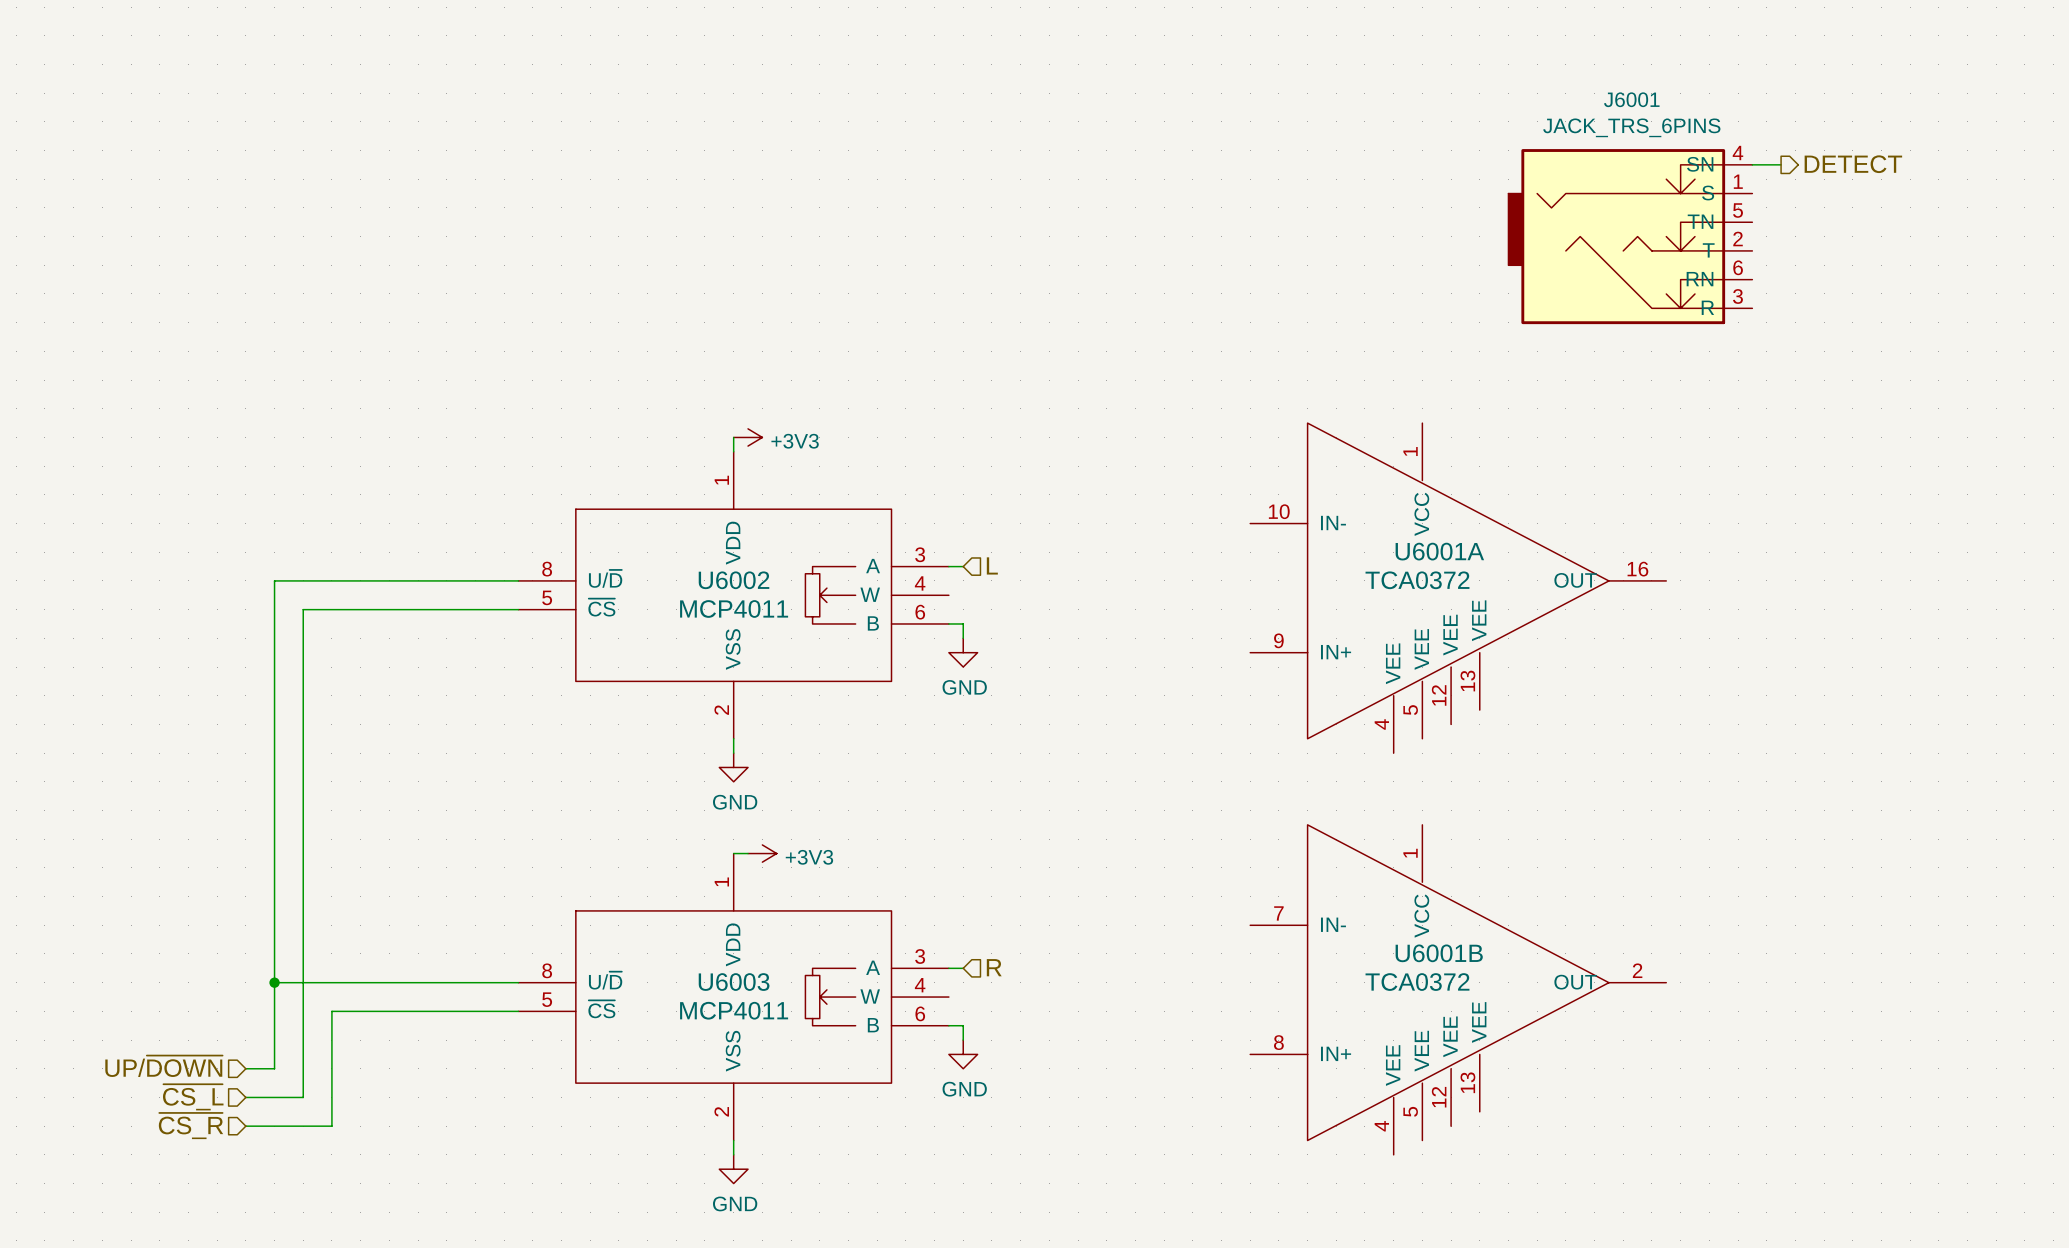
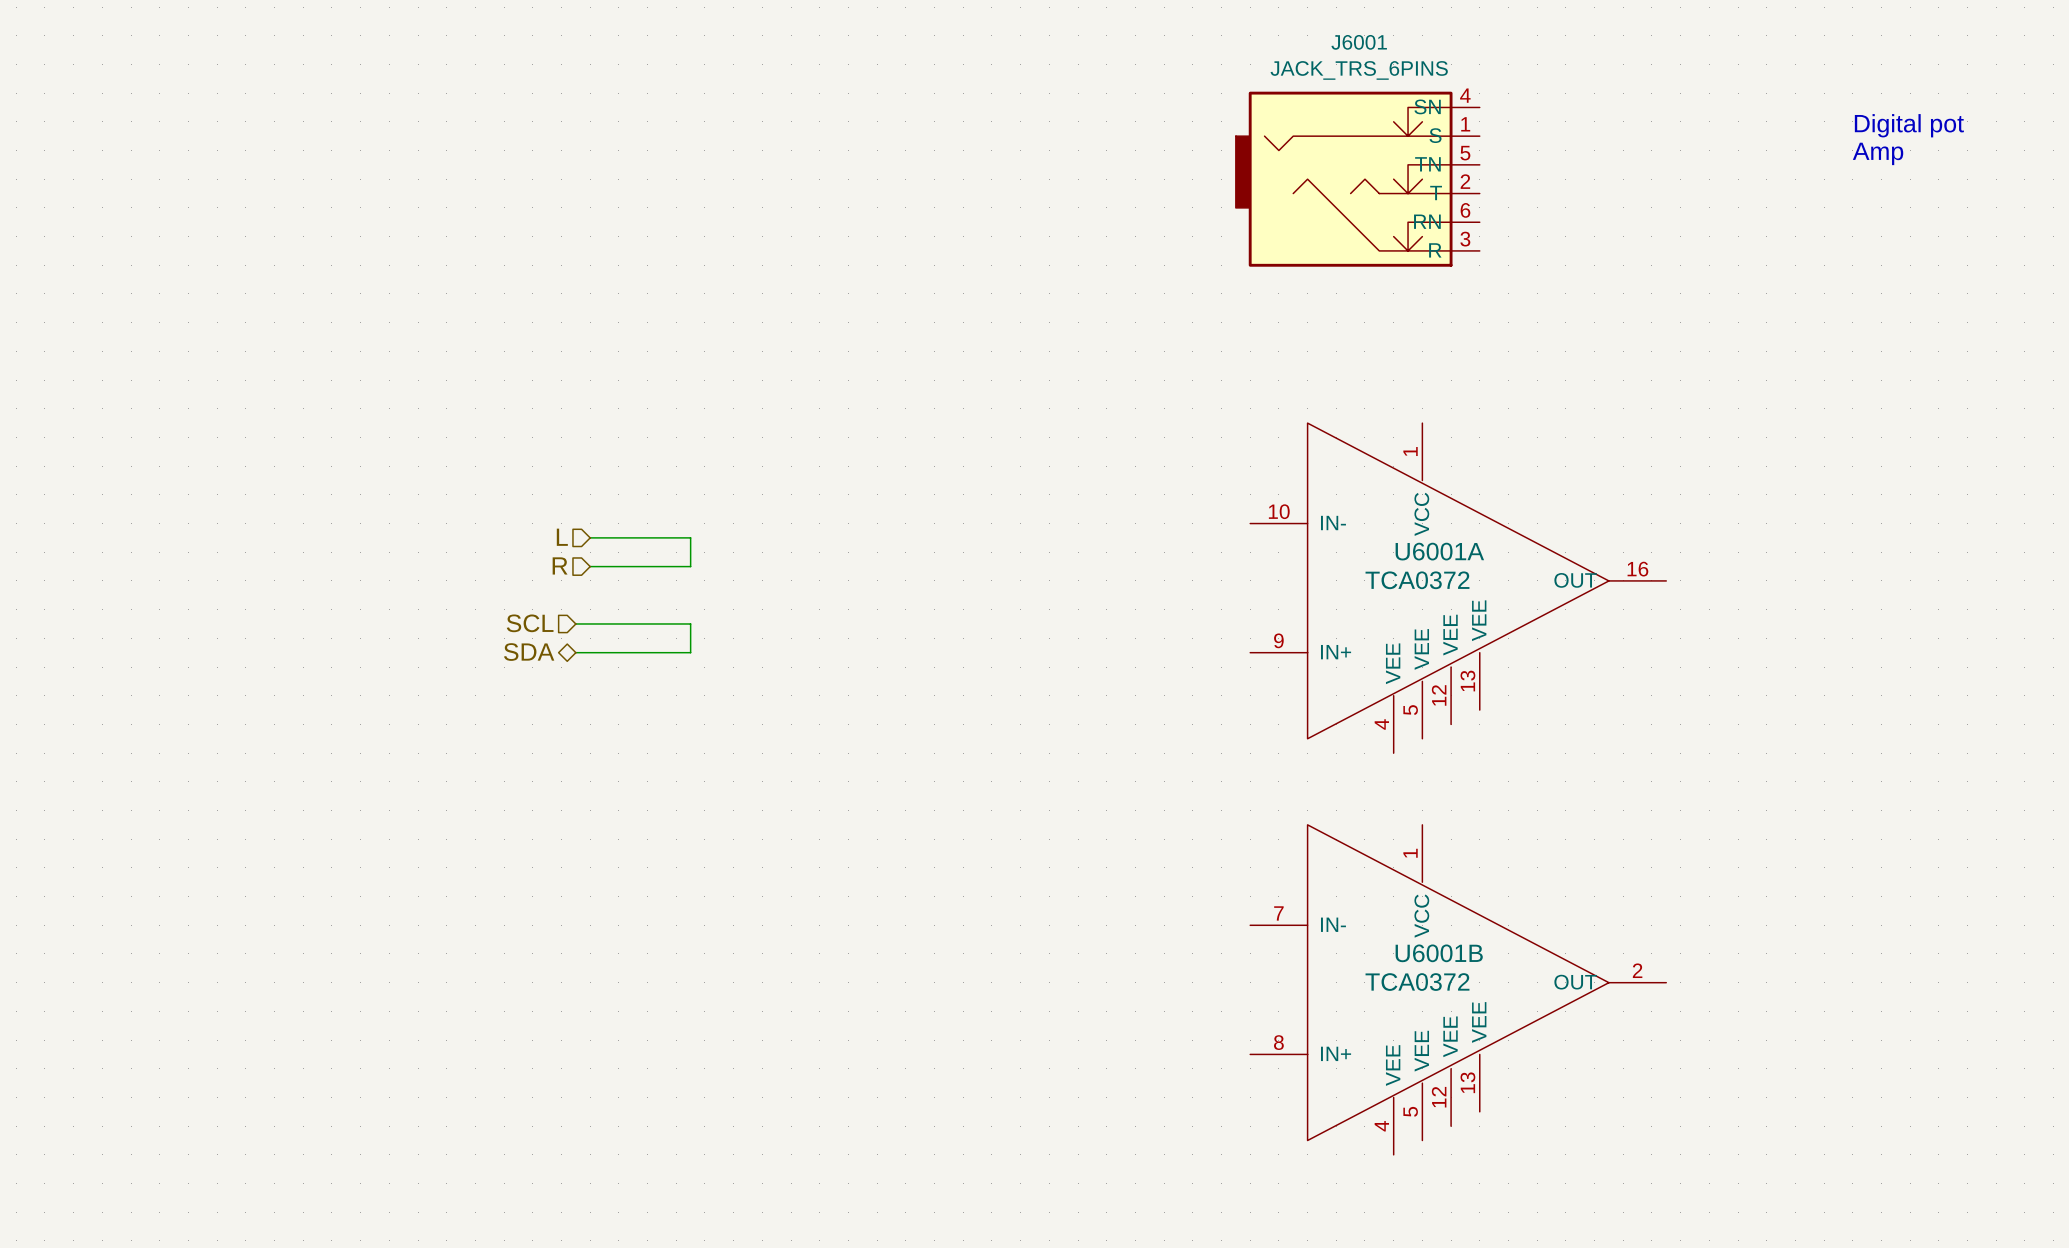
text: none -> Digital pot (1909, 125)
text: none -> Amp (1878, 153)
wire: (1752, 164) (1781, 164) -> none
hierarchical label: DETECT (1853, 164) -> none
J6001 position: (1630, 236) -> (1357, 179)
wire: (733, 437) (733, 451) -> none
power symbol: +3V3 (748, 437) -> none
hierarchical label: none -> L (562, 537)
wire: none -> (590, 537) (690, 537) (690, 566) (590, 566)
hierarchical label: none -> R (560, 565)
hierarchical label: L (992, 565) -> none
wire: (948, 566) (963, 566) -> none
wire: (518, 580) (274, 580) (274, 1068) (245, 1068) -> none
U6002: MCP4011 (733, 595) -> none
wire: (518, 609) (303, 609) (303, 1097) (245, 1097) -> none
hierarchical label: none -> SCL (530, 623)
wire: none -> (575, 623) (690, 623) (690, 652) (575, 652)
wire: (948, 623) (963, 623) (963, 638) -> none
hierarchical label: none -> SDA (529, 652)
power symbol: GND (963, 652) -> none
wire: (733, 738) (733, 753) -> none
power symbol: GND (733, 767) -> none
wire: (733, 853) (748, 853) -> none
power symbol: +3V3 (762, 853) -> none
hierarchical label: R (994, 967) -> none
wire: (948, 968) (963, 968) -> none
wire: (274, 982) (518, 982) -> none
junction: (274, 982) -> none
U6003: MCP4011 (733, 997) -> none
wire: (518, 1011) (331, 1011) (331, 1126) (245, 1126) -> none
wire: (948, 1025) (963, 1025) (963, 1040) -> none
power symbol: GND (963, 1054) -> none
hierarchical label: UP/~{DOWN} (163, 1066) -> none
hierarchical label: ~{CS_L} (193, 1097) -> none
hierarchical label: ~{CS_R} (191, 1126) -> none
wire: (733, 1140) (733, 1154) -> none
power symbol: GND (733, 1169) -> none

